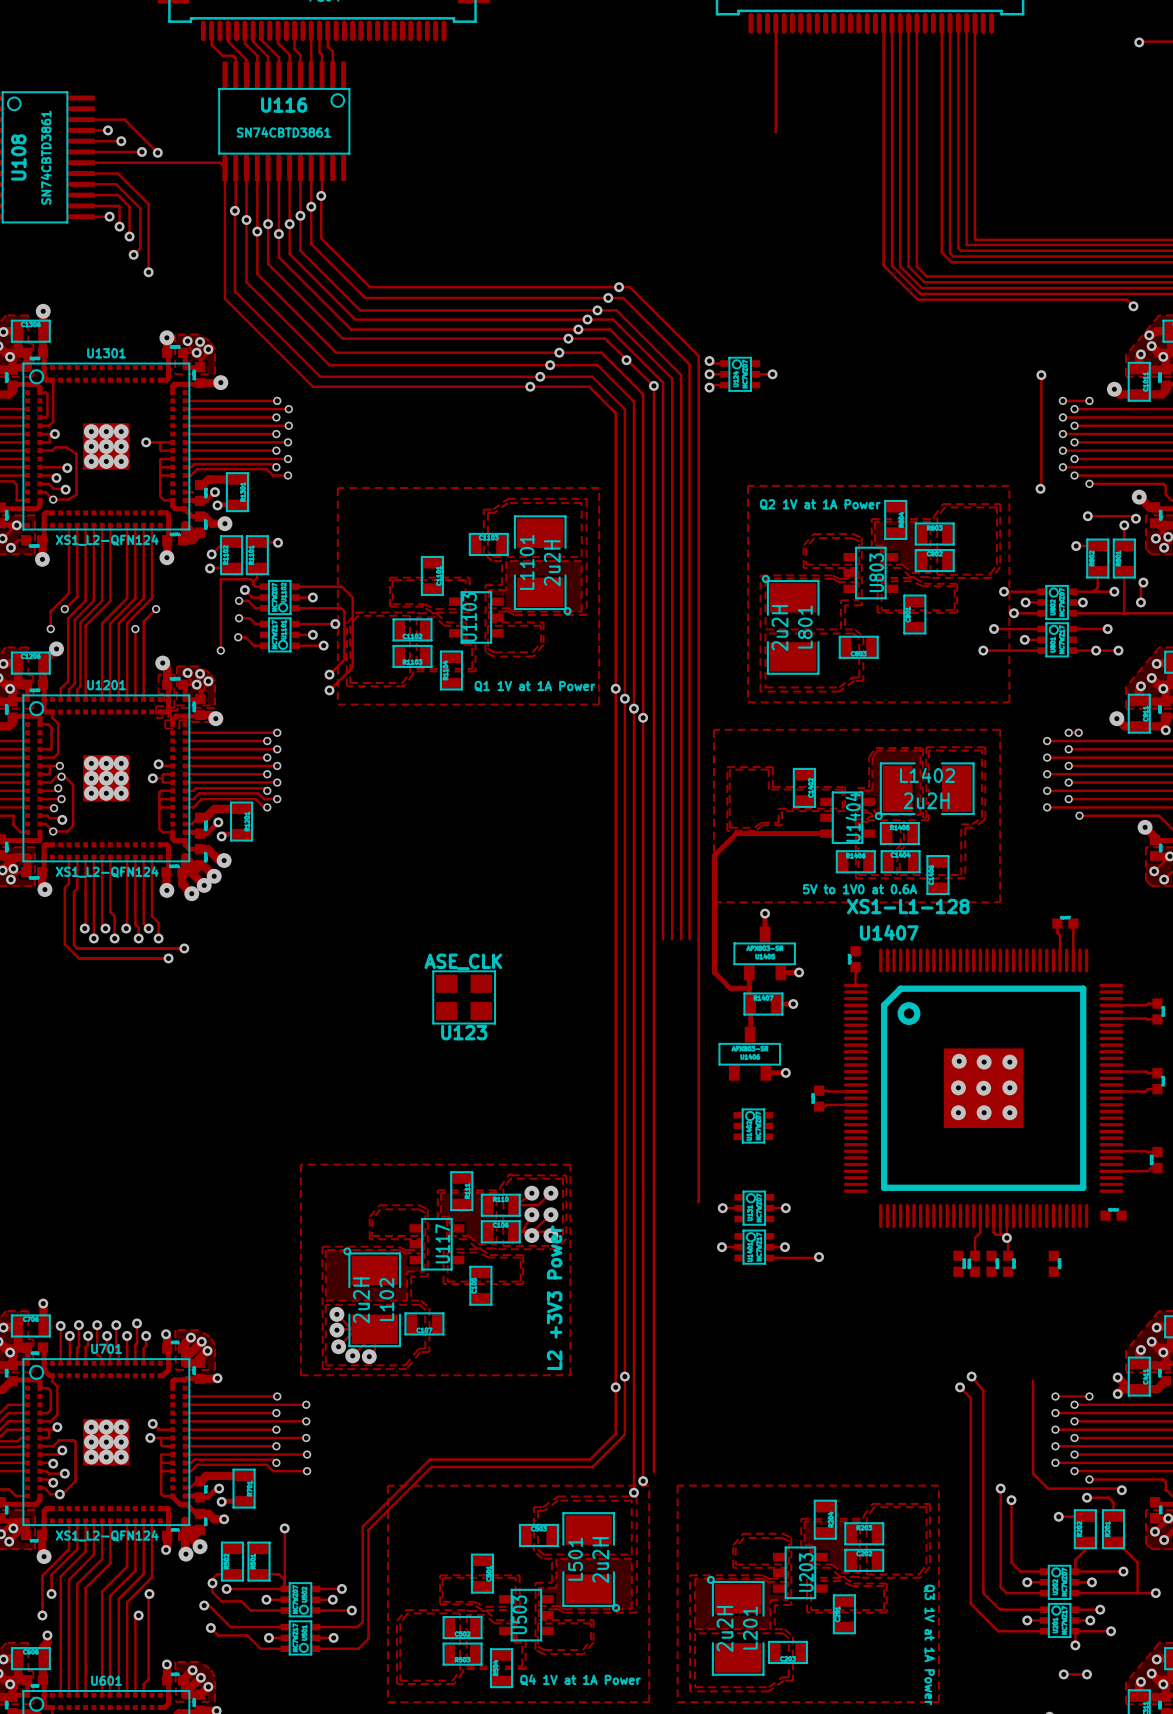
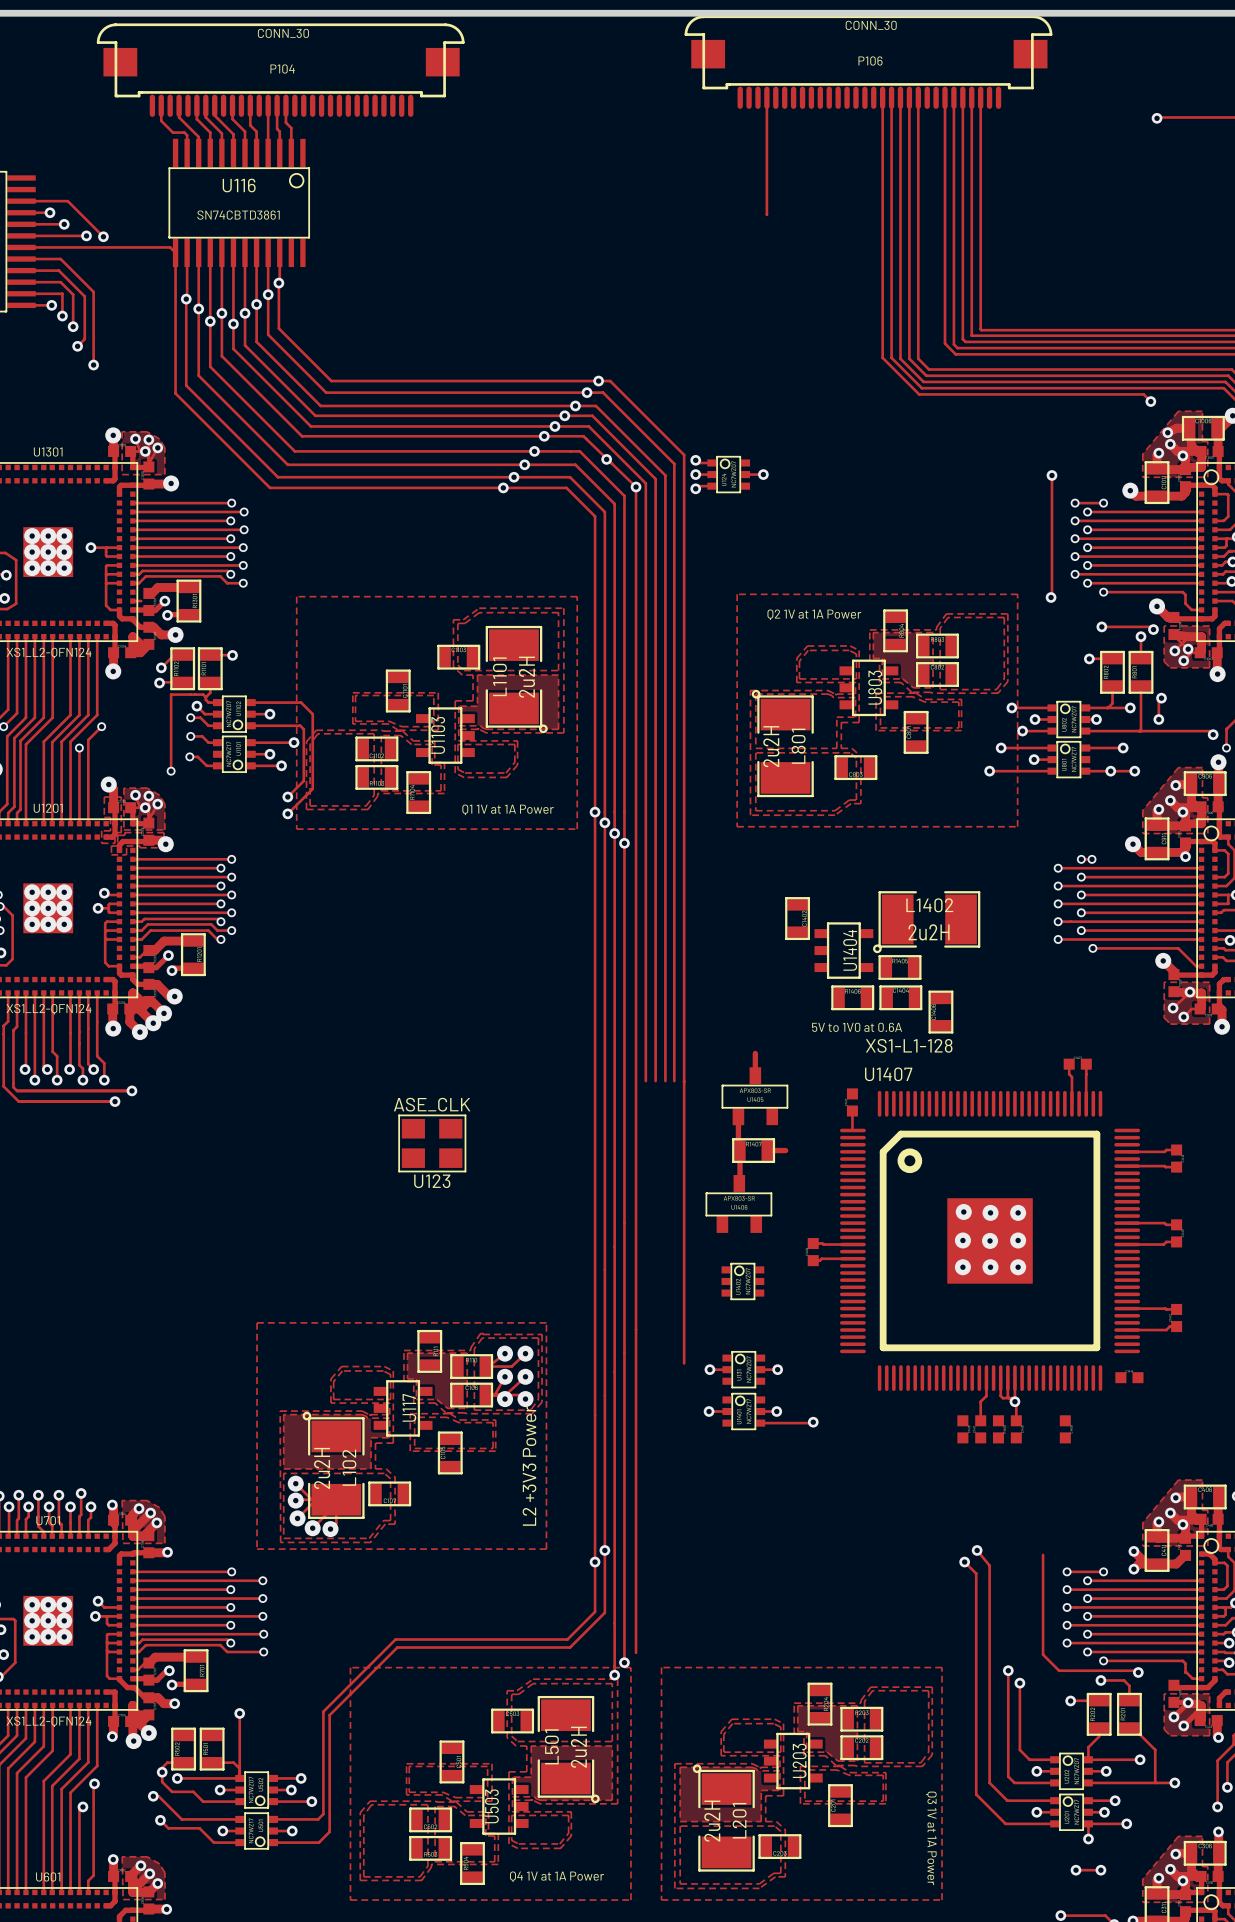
zone outline: (713, 729) (1000, 729) (1000, 902) (713, 902) (713, 729) -> none
zone outline: (926, 747) (926, 817) (923, 817) (923, 748) (875, 748) (869, 757) (869, 787) (857, 787) (857, 812) (869, 812) (873, 816) (866, 819) (855, 819) (855, 878) (965, 878) (965, 827) (973, 827) (985, 818) (985, 747) (926, 747) -> none
zone outline: (877, 750) (920, 750) (920, 815) (878, 815) (873, 810) (859, 810) (859, 790) (872, 790) (872, 757) (877, 750) -> none
zone outline: (928, 750) (928, 820) (903, 820) (903, 847) (899, 850) (899, 874) (961, 874) (961, 824) (972, 824) (981, 817) (981, 750) (928, 750) -> none
zone outline: (727, 767) (727, 831) (755, 831) (762, 825) (782, 825) (782, 811) (845, 811) (845, 787) (772, 787) (772, 767) (727, 767) -> none
zone outline: (729, 769) (768, 769) (768, 789) (842, 789) (842, 808) (778, 808) (778, 822) (761, 822) (754, 827) (729, 827) (729, 769) -> none
zone outline: (869, 820) (858, 821) (858, 874) (897, 874) (897, 847) (900, 845) (900, 820) (869, 820) -> none
track: (826, 833) (736, 833) (714, 855) (714, 972) (730, 988) (749, 988) -> none
via: (765, 913) -> none
track: (780, 972) (799, 972) -> none
via: (799, 972) -> none
via: (793, 1004) -> none
track: (765, 1072) (785, 1072) -> none
via: (785, 1072) -> none

